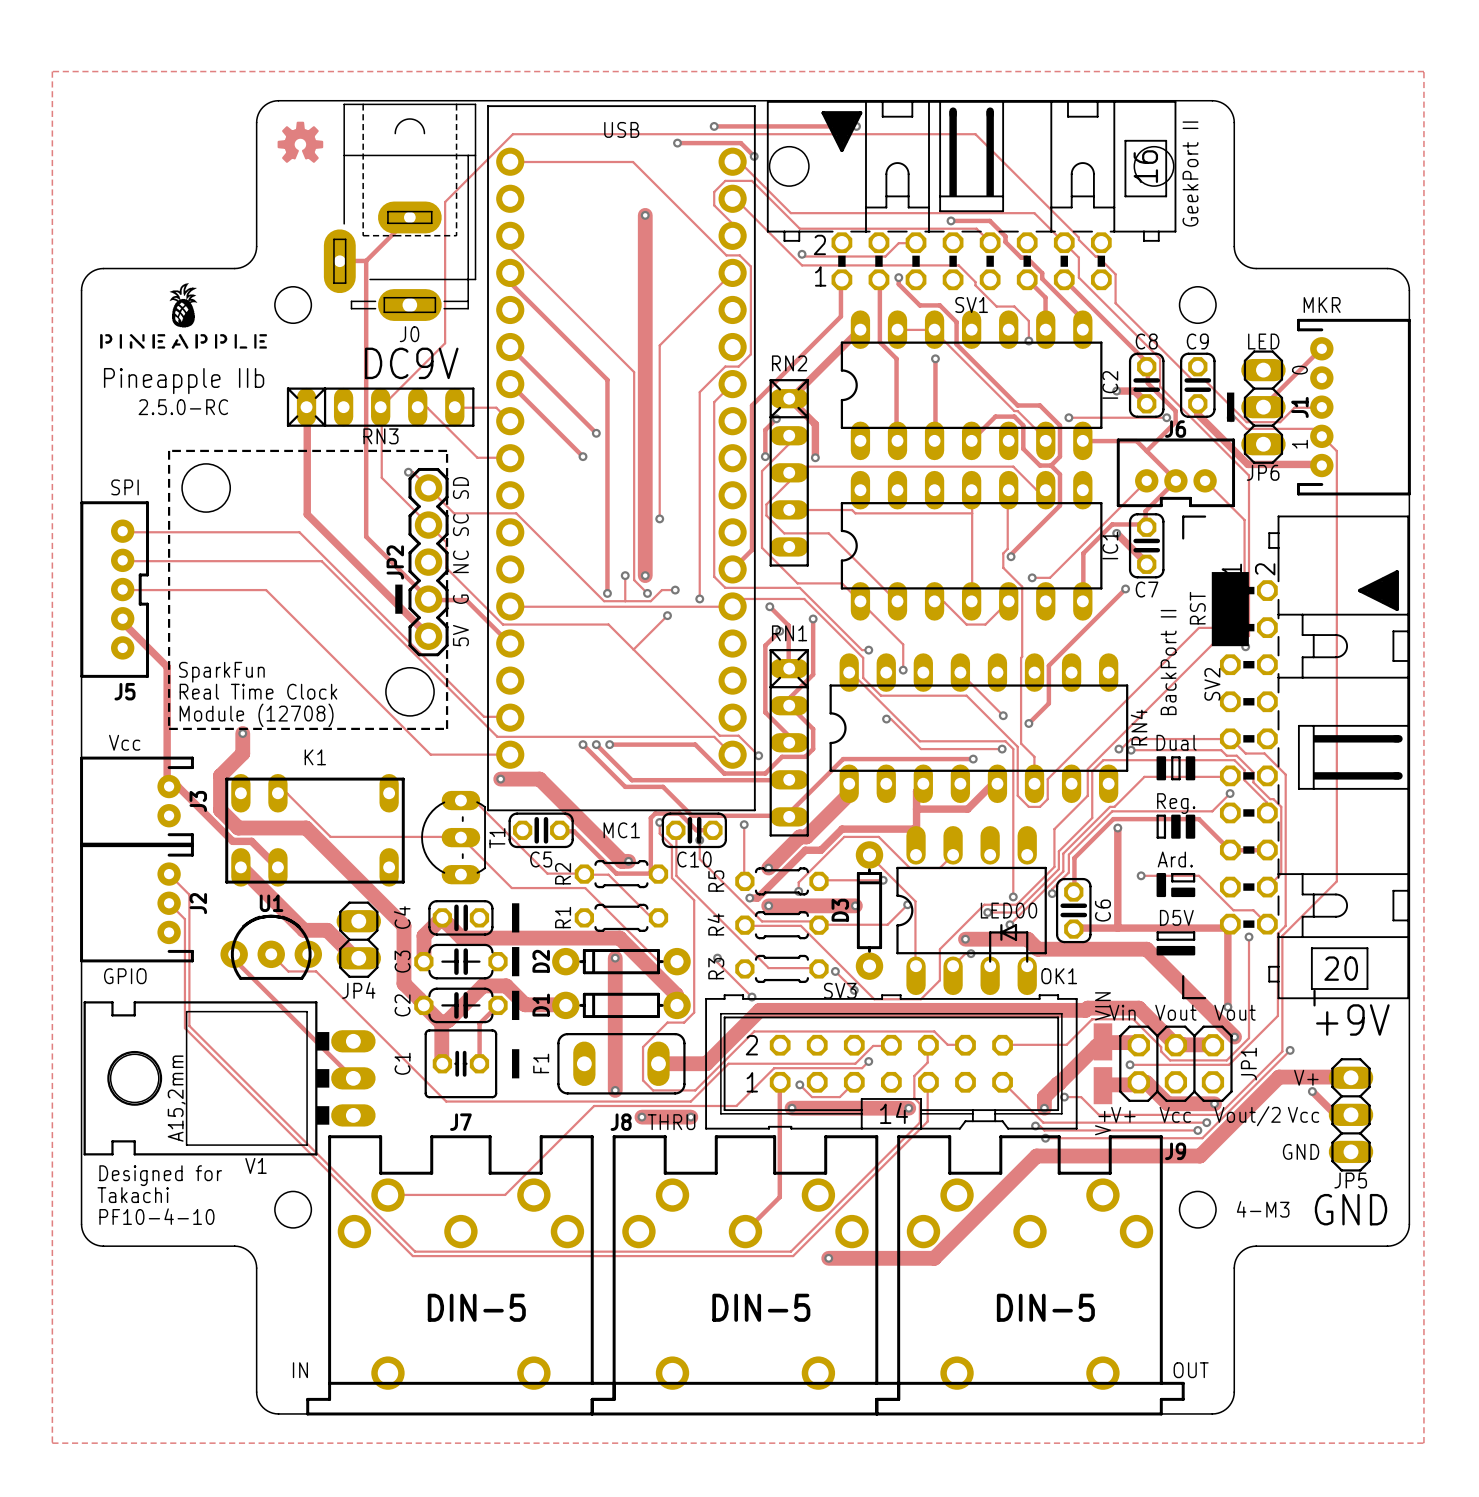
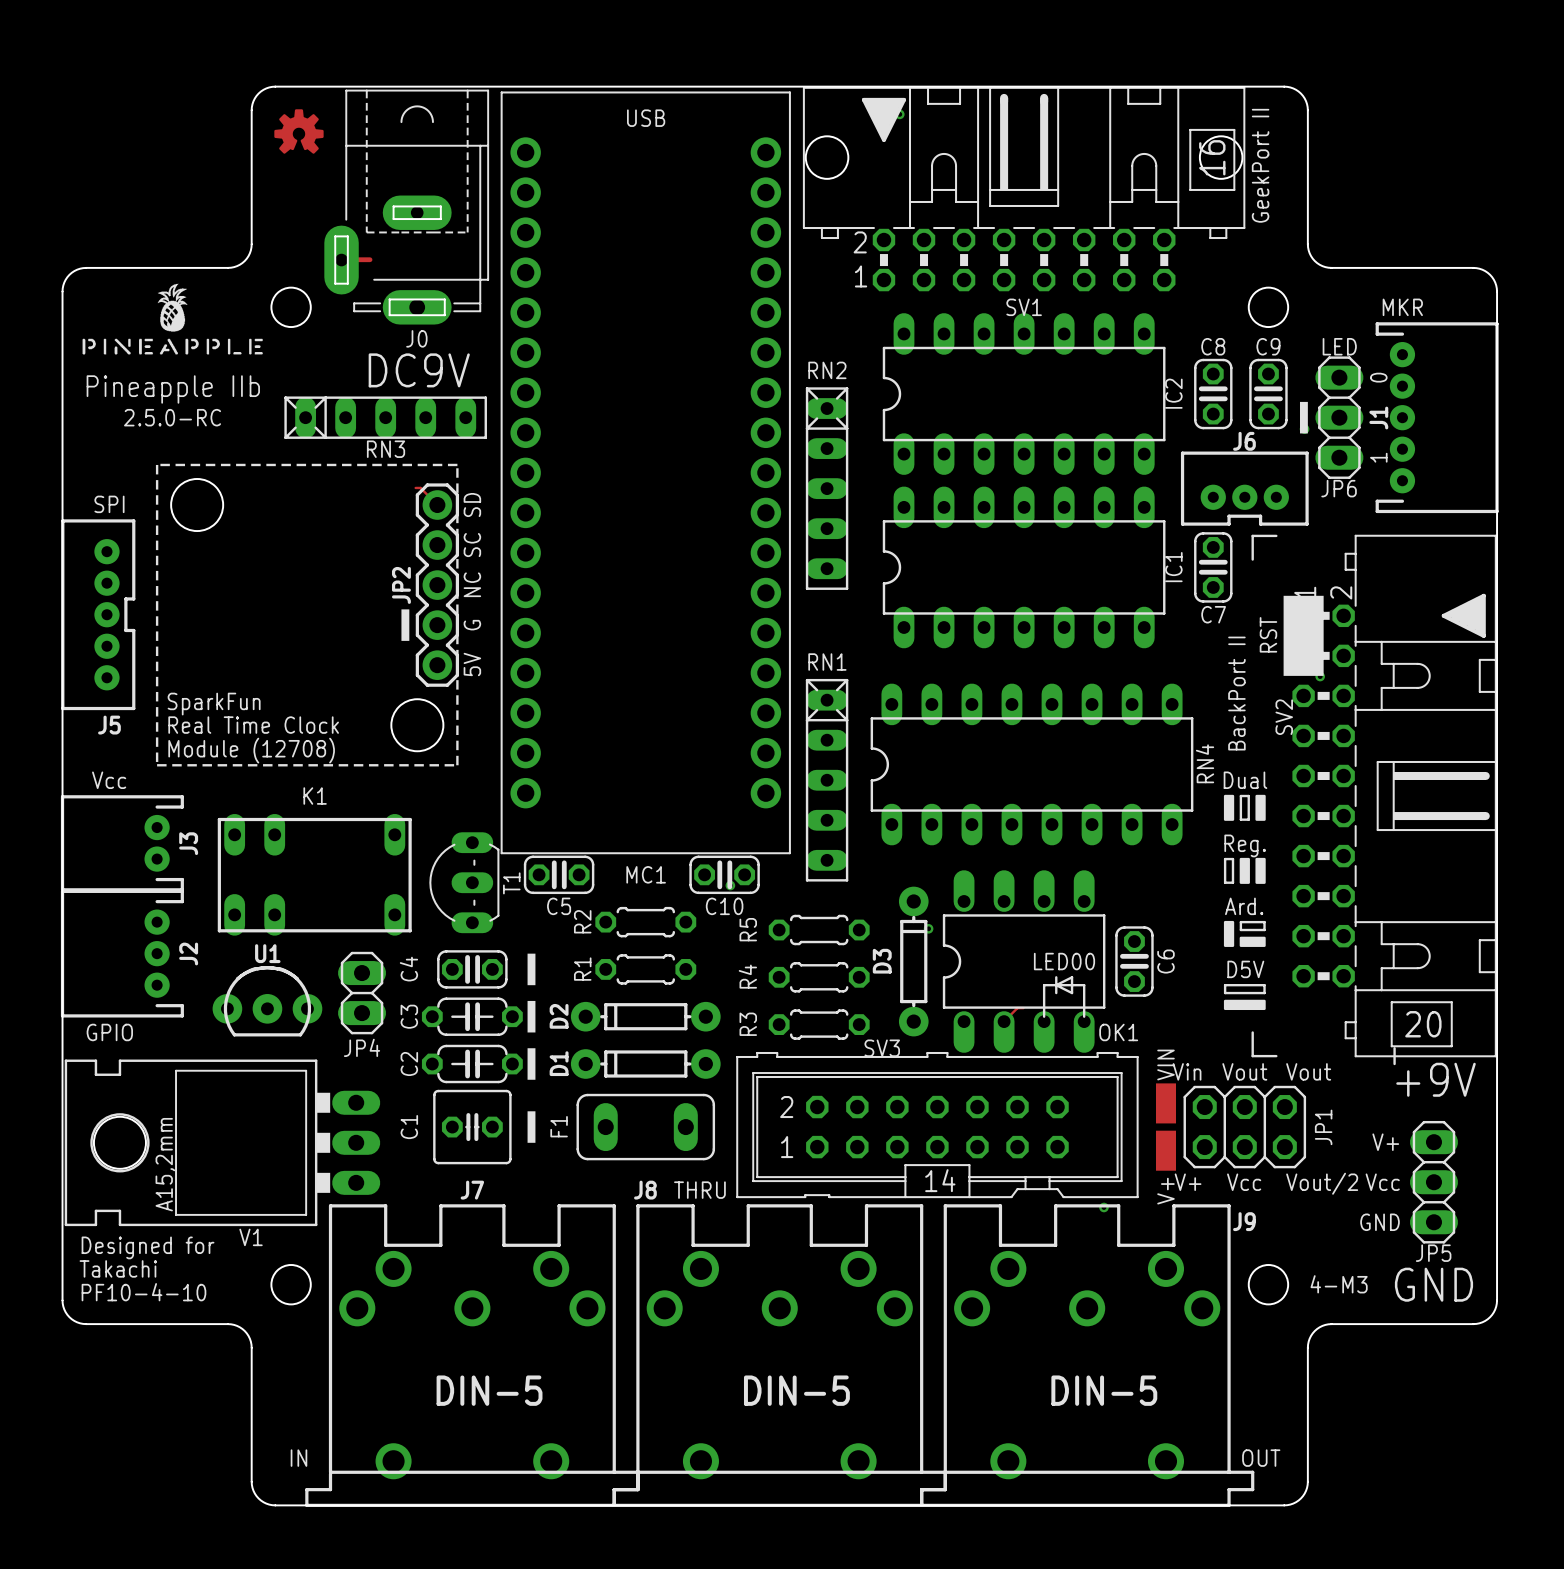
zone outline: (52, 71) (1423, 71) (1423, 1443) (52, 1443) (52, 71) -> none
track: (714, 126) (856, 126) -> none
via: (714, 126) -> none
track: (677, 143) (740, 143) (754, 156) -> none
via: (677, 143) -> none
via: (754, 156) -> none
track: (510, 161) (633, 162) (726, 255) (739, 255) (750, 266) (750, 354) (738, 366) (725, 366) (699, 392) (699, 598) -> none
track: (732, 161) (739, 162) (790, 213) (1034, 213) (1078, 257) (1078, 277) (1160, 358) (1160, 386) (1249, 475) (1249, 635) (1245, 638) (1245, 646) -> none
track: (732, 198) (736, 199) (802, 265) (958, 265) (996, 306) (1014, 306) (1028, 321) (1028, 341) -> none
track: (645, 215) (645, 575) -> none
via: (645, 215) -> none
track: (409, 217) (366, 260) (366, 536) (429, 600) (466, 600) (510, 643) -> none
track: (951, 220) (989, 220) (1005, 236) (1005, 242) (1021, 257) (1026, 257) (1042, 273) (1042, 278) (1082, 318) (1082, 329) -> none
via: (951, 220) -> none
track: (510, 235) (510, 248) (634, 372) (634, 580) (647, 593) -> none
track: (732, 235) (731, 223) (714, 205) (714, 192) (725, 180) (752, 180) (799, 228) (976, 228) (990, 242) -> none
track: (916, 242) (898, 243) (885, 256) (804, 256) (802, 254) -> none
via: (802, 254) -> none
track: (510, 272) (510, 283) (607, 379) (607, 593) -> none
track: (732, 272) (659, 345) (659, 518) -> none
track: (898, 277) (898, 284) (919, 305) (939, 305) (956, 322) (956, 344) (1017, 405) (1039, 405) (1059, 425) (1059, 456) (1051, 465) -> none
via: (898, 277) -> none
track: (841, 279) (840, 316) (752, 405) (752, 550) (732, 569) -> none
track: (878, 279) (879, 342) (896, 358) (897, 440) -> none
track: (1027, 279) (1045, 297) (1045, 329) -> none
track: (1064, 279) (1146, 362) (1146, 366) -> none
track: (860, 329) (789, 398) (815, 424) (815, 457) -> none
track: (897, 329) (934, 329) (1045, 440) -> none
via: (1028, 341) -> none
track: (510, 347) (596, 433) -> none
track: (1321, 348) (1263, 407) -> none
track: (935, 358) (934, 440) -> none
via: (935, 358) -> none
track: (1146, 366) (1147, 383) (1175, 411) (1175, 422) (1146, 451) -> none
track: (510, 384) (583, 456) -> none
track: (732, 384) (714, 402) (714, 576) (725, 587) (799, 587) (862, 650) (868, 650) -> none
track: (1116, 391) (1134, 391) (1146, 403) -> none
via: (1116, 391) -> none
track: (1197, 403) (1197, 414) (1247, 464) (1321, 465) -> none
track: (306, 407) (307, 514) (428, 636) -> none
track: (417, 407) (427, 407) (477, 457) (510, 458) -> none
track: (454, 407) (496, 407) (510, 421) -> none
track: (1321, 407) (1294, 407) (1280, 422) (1246, 422) (1204, 379) (1192, 379) (1115, 303) (1115, 274) (1095, 256) (975, 134) (512, 134) (445, 202) (445, 343) (380, 407) (381, 477) (446, 542) (446, 567) (502, 624) (608, 624) (719, 735) (738, 735) (758, 755) -> none
track: (1068, 417) (1166, 417) -> none
via: (1068, 417) -> none
via: (1166, 417) -> none
track: (1231, 417) (1235, 417) (1246, 428) (1314, 428) (1336, 451) (1336, 881) (1282, 935) (1282, 1051) (1218, 1114) (1098, 1114) (1081, 1097) (1064, 1097) -> none
track: (776, 418) (765, 429) (765, 456) -> none
via: (776, 418) -> none
via: (596, 433) -> none
track: (789, 435) (788, 444) (762, 471) (762, 547) (797, 583) (842, 583) (903, 644) (903, 670) -> none
track: (971, 440) (995, 416) (1014, 416) (1023, 425) (1023, 448) (1039, 465) (1051, 465) -> none
track: (1082, 440) (1136, 441) (1175, 480) (1145, 511) (1145, 523) (1146, 527) (1144, 524) (1112, 524) (1083, 553) (1082, 601) -> none
via: (583, 456) -> none
via: (765, 456) -> none
via: (815, 457) -> none
track: (1051, 465) (1059, 474) (1059, 505) (1011, 554) (1011, 556) -> none
via: (408, 472) -> none
track: (1205, 480) (1244, 520) (1244, 633) (1235, 642) (1214, 642) (1087, 769) (1087, 795) (1054, 829) (1054, 866) (1016, 904) (984, 904) (939, 949) (939, 980) (921, 999) (874, 999) (800, 925) (744, 925) -> none
track: (1146, 481) (1049, 577) (1032, 577) -> none
track: (428, 487) (454, 513) (516, 513) (604, 601) (650, 601) (661, 590) (675, 590) -> none
track: (971, 490) (971, 601) -> none
track: (1008, 490) (1007, 548) (1003, 553) (1003, 567) (1022, 586) (1021, 743) (1034, 756) (1034, 783) -> none
track: (1045, 490) (1036, 490) (1013, 466) (795, 466) (788, 473) (788, 482) (766, 504) (766, 515) (784, 533) (828, 533) (897, 601) -> none
track: (789, 509) (852, 510) (855, 513) (972, 513) -> none
via: (659, 518) -> none
track: (122, 531) (299, 532) (484, 716) (510, 717) -> none
track: (1116, 533) (1146, 564) -> none
via: (1116, 533) -> none
via: (1011, 556) -> none
track: (122, 560) (321, 561) (497, 736) (714, 736) (732, 754) -> none
track: (625, 575) (625, 601) -> none
via: (625, 575) -> none
via: (645, 575) -> none
via: (1032, 577) -> none
track: (1125, 588) (1048, 665) (1048, 703) (1028, 723) -> none
via: (1125, 588) -> none
track: (122, 589) (266, 590) (430, 754) (510, 754) -> none
via: (675, 590) -> none
via: (607, 593) -> none
via: (647, 593) -> none
via: (699, 598) -> none
track: (934, 601) (944, 602) (966, 624) (985, 624) (1008, 601) -> none
track: (510, 606) (731, 606) (739, 598) (804, 598) (863, 657) (863, 677) (880, 695) (966, 695) (1017, 746) (1017, 795) (1028, 806) (1039, 806) (1047, 799) (1047, 779) (1198, 627) (1230, 627) -> none
track: (769, 606) (788, 625) (789, 668) -> none
via: (769, 606) -> none
track: (667, 615) (633, 649) -> none
via: (667, 615) -> none
track: (122, 618) (123, 623) (167, 666) (167, 783) (169, 786) (178, 786) (232, 841) (251, 841) (277, 867) -> none
track: (813, 618) (813, 674) (789, 697) (789, 705) (813, 729) (813, 749) (805, 756) (782, 756) (765, 773) (724, 773) (695, 744) (609, 744) -> none
via: (813, 618) -> none
track: (779, 631) (765, 645) (765, 712) (788, 735) (789, 742) -> none
via: (779, 631) -> none
via: (868, 650) -> none
via: (903, 670) -> none
track: (849, 672) (919, 741) (1005, 741) (1013, 749) (1013, 896) -> none
track: (960, 672) (1003, 715) -> none
via: (1003, 715) -> none
track: (886, 719) (890, 719) (921, 749) (1002, 749) -> none
via: (886, 719) -> none
via: (1028, 723) -> none
track: (242, 733) (242, 753) (220, 775) (220, 810) (238, 828) (306, 828) (403, 925) (403, 983) (441, 1023) -> none
via: (242, 733) -> none
track: (583, 744) (625, 786) (663, 786) (691, 815) (789, 816) (788, 813) (843, 759) (973, 759) -> none
via: (583, 744) -> none
track: (596, 744) (631, 780) (789, 779) -> none
via: (596, 744) -> none
via: (609, 744) -> none
via: (1002, 749) -> none
track: (1118, 749) (1131, 739) (1230, 738) (1245, 753) (1264, 753) (1285, 774) (1285, 925) (1277, 933) (1277, 1015) (1228, 1064) (1130, 1064) -> none
via: (1118, 749) -> none
track: (1131, 750) (1221, 750) (1226, 755) (1236, 755) (1253, 772) (1253, 782) (1270, 799) (1273, 799) (1281, 806) (1281, 873) (1267, 887) -> none
via: (1131, 750) -> none
via: (758, 755) -> none
via: (973, 759) -> none
track: (1230, 775) (1144, 776) (1114, 806) (1110, 806) (1063, 853) (1063, 871) (1009, 924) -> none
track: (500, 779) (539, 779) (621, 861) (628, 861) -> none
via: (500, 779) -> none
track: (849, 783) (848, 794) (806, 836) (799, 836) (768, 868) -> none
track: (923, 783) (916, 791) (916, 854) (913, 829) (842, 829) (820, 850) (805, 850) (757, 898) (749, 898) -> none
track: (997, 783) (992, 784) (967, 809) (916, 809) -> none
track: (277, 793) (287, 793) (330, 836) (460, 836) (511, 888) (585, 888) (658, 961) (677, 961) -> none
track: (1230, 793) (1212, 811) (1112, 811) (1068, 854) (1068, 872) (1052, 889) (1052, 893) -> none
via: (1230, 793) -> none
track: (460, 800) (475, 801) (547, 873) (608, 874) (650, 916) (658, 917) -> none
track: (1267, 812) (1266, 802) (1244, 780) (1244, 770) (1234, 760) (1103, 760) (1092, 771) (1092, 818) (1058, 851) (1058, 869) (1015, 912) (987, 912) -> none
track: (659, 822) (659, 833) (671, 845) (671, 878) (694, 900) (694, 1012) (684, 1022) (667, 1022) (643, 1047) (643, 1080) (653, 1090) (695, 1090) (754, 1031) (934, 1031) (947, 1044) (965, 1045) -> none
via: (659, 822) -> none
track: (744, 824) (744, 881) -> none
via: (744, 824) -> none
track: (1117, 828) (1117, 928) -> none
via: (1117, 828) -> none
track: (559, 830) (574, 831) (616, 873) (658, 874) (650, 872) (650, 818) (655, 813) (679, 813) (696, 830) (712, 830) -> none
track: (675, 830) (676, 875) (768, 968) (819, 968) -> none
track: (699, 840) (699, 859) (762, 921) (815, 921) (819, 925) (887, 924) (907, 904) -> none
track: (1267, 850) (1230, 850) (1198, 819) (1113, 819) (1074, 858) (1073, 892) -> none
track: (869, 854) (915, 901) (916, 966) -> none
track: (953, 854) (939, 868) (909, 868) (878, 836) (844, 836) (798, 882) (798, 891) -> none
via: (628, 861) -> none
track: (240, 867) (303, 930) (327, 930) (355, 958) (358, 958) -> none
via: (768, 868) -> none
track: (169, 874) (189, 894) (189, 1025) (415, 1251) (790, 1251) (919, 1122) (919, 1103) (914, 1098) (914, 1075) (927, 1062) (928, 1045) -> none
track: (1141, 875) (1198, 875) (1233, 910) (1253, 910) (1267, 924) -> none
via: (1141, 875) -> none
track: (883, 880) (819, 881) -> none
via: (798, 891) -> none
via: (1052, 893) -> none
via: (1013, 896) -> none
via: (749, 898) -> none
track: (169, 903) (184, 919) (184, 1028) (412, 1256) (793, 1256) (927, 1121) (928, 1082) -> none
via: (907, 904) -> none
track: (768, 905) (855, 905) -> none
via: (768, 905) -> none
via: (855, 905) -> none
via: (987, 912) -> none
via: (1009, 924) -> none
track: (1073, 929) (1226, 928) (1230, 924) (1227, 931) (1227, 1007) -> none
track: (1249, 936) (1249, 1038) (1226, 1060) (1170, 1060) (1161, 1051) (1161, 1047) (1133, 1019) (1092, 1019) (1066, 1044) (1002, 1045) -> none
via: (1249, 936) -> none
track: (965, 939) (1027, 939) (1037, 949) (1146, 949) (1234, 1037) -> none
via: (965, 939) -> none
via: (971, 953) -> none
track: (234, 954) (234, 960) (353, 1078) -> none
track: (271, 954) (288, 971) (316, 971) (446, 1101) (690, 1101) (728, 1063) (855, 1063) (873, 1045) (891, 1045) -> none
track: (615, 958) (615, 1090) -> none
via: (615, 958) -> none
track: (717, 958) (717, 962) (752, 997) -> none
via: (717, 958) -> none
track: (424, 961) (424, 935) (442, 917) (461, 938) (619, 938) (676, 994) (677, 1005) -> none
track: (835, 971) (854, 990) -> none
via: (835, 971) -> none
via: (854, 990) -> none
via: (752, 997) -> none
track: (497, 1005) (479, 1023) (479, 1063) -> none
track: (565, 1005) (525, 1004) (506, 985) (482, 985) (448, 1020) (441, 1023) -> none
via: (1227, 1007) -> none
track: (441, 1023) (442, 1063) -> none
via: (1234, 1037) -> none
track: (1138, 1045) (1135, 1042) (1102, 1041) (1096, 1045) (1044, 1097) (1044, 1108) -> none
track: (1212, 1045) (1175, 1045) (1138, 1008) (1087, 1008) (1085, 1010) (759, 1010) (706, 1063) (658, 1063) -> none
track: (1290, 1050) (1202, 1138) (1045, 1138) -> none
via: (1290, 1050) -> none
track: (868, 1061) (862, 1068) (774, 1068) (736, 1105) (594, 1105) (505, 1194) (387, 1195) -> none
via: (868, 1061) -> none
via: (1130, 1064) -> none
track: (1351, 1077) (1279, 1077) (1200, 1156) (1036, 1156) (934, 1258) (828, 1258) -> none
track: (780, 1082) (779, 1197) (745, 1231) -> none
track: (854, 1082) (839, 1097) (812, 1097) (799, 1084) -> none
track: (1002, 1082) (1043, 1122) (1206, 1122) -> none
via: (799, 1084) -> none
track: (1102, 1085) (1146, 1082) (1167, 1103) (1214, 1103) -> none
via: (615, 1090) -> none
track: (1312, 1091) (1334, 1113) (1351, 1114) -> none
via: (1312, 1091) -> none
via: (1064, 1097) -> none
via: (1214, 1103) -> none
track: (792, 1108) (908, 1108) -> none
via: (792, 1108) -> none
via: (908, 1108) -> none
via: (1044, 1108) -> none
track: (641, 1117) (690, 1117) -> none
via: (641, 1117) -> none
via: (690, 1117) -> none
via: (1206, 1122) -> none
track: (1035, 1126) (1039, 1126) (1044, 1130) (1197, 1130) -> none
via: (1035, 1126) -> none
via: (1197, 1130) -> none
via: (828, 1258) -> none

